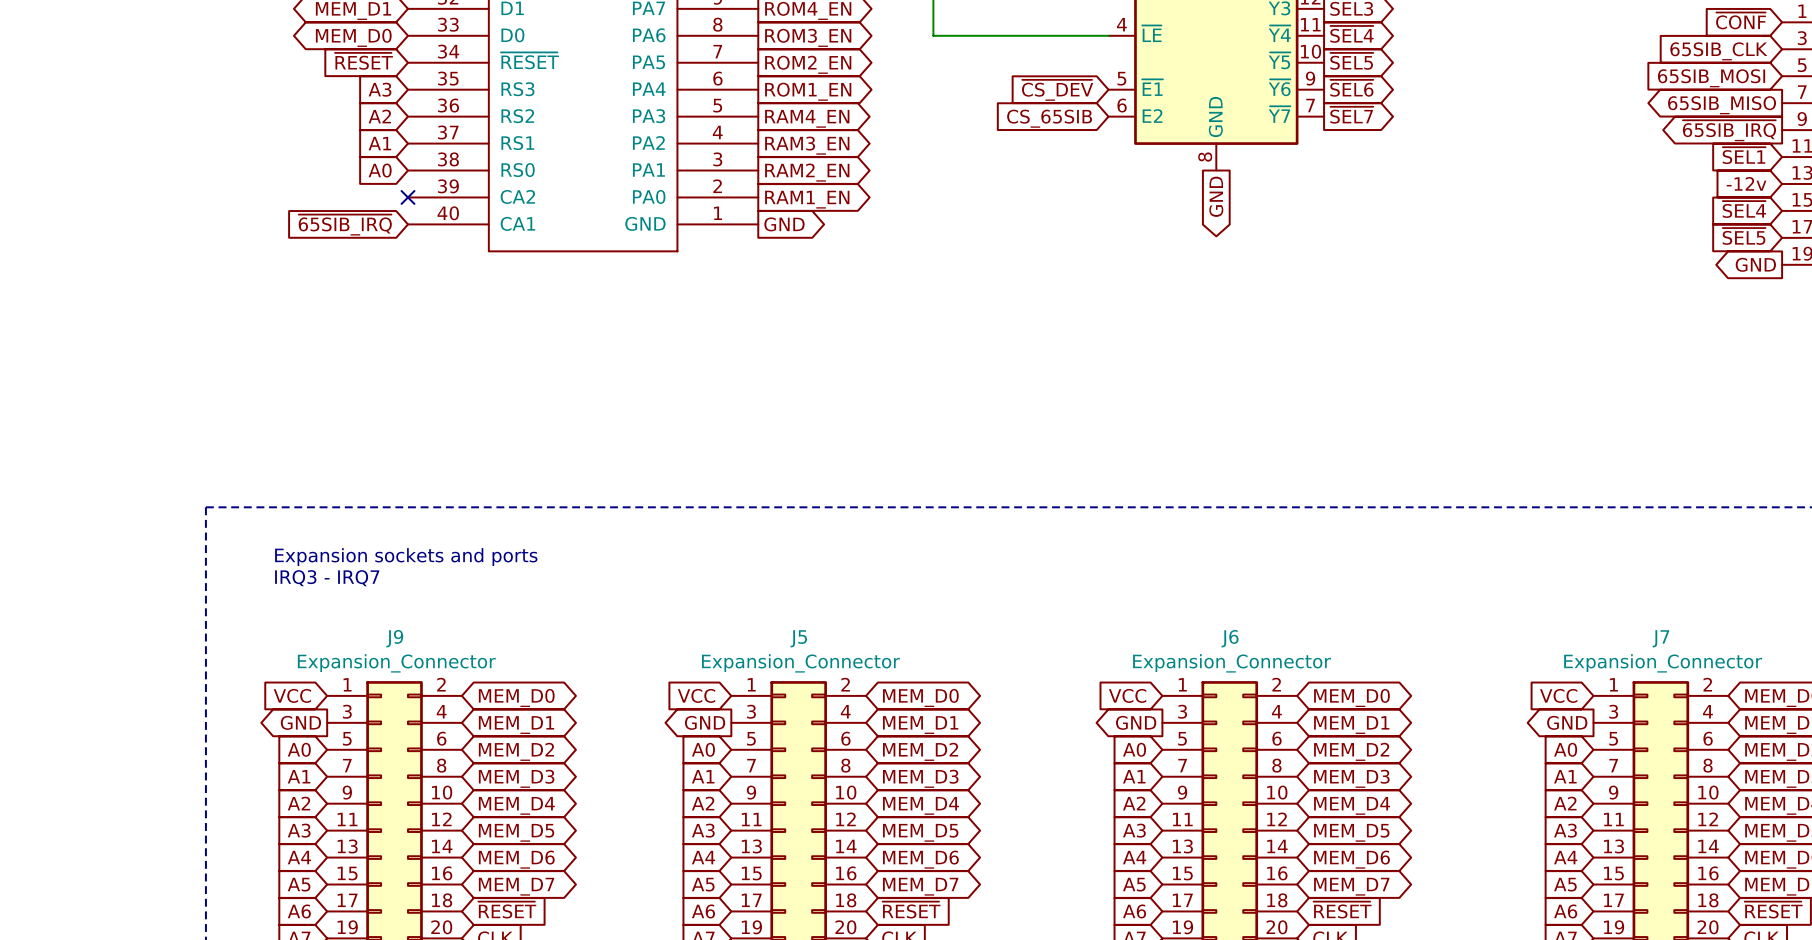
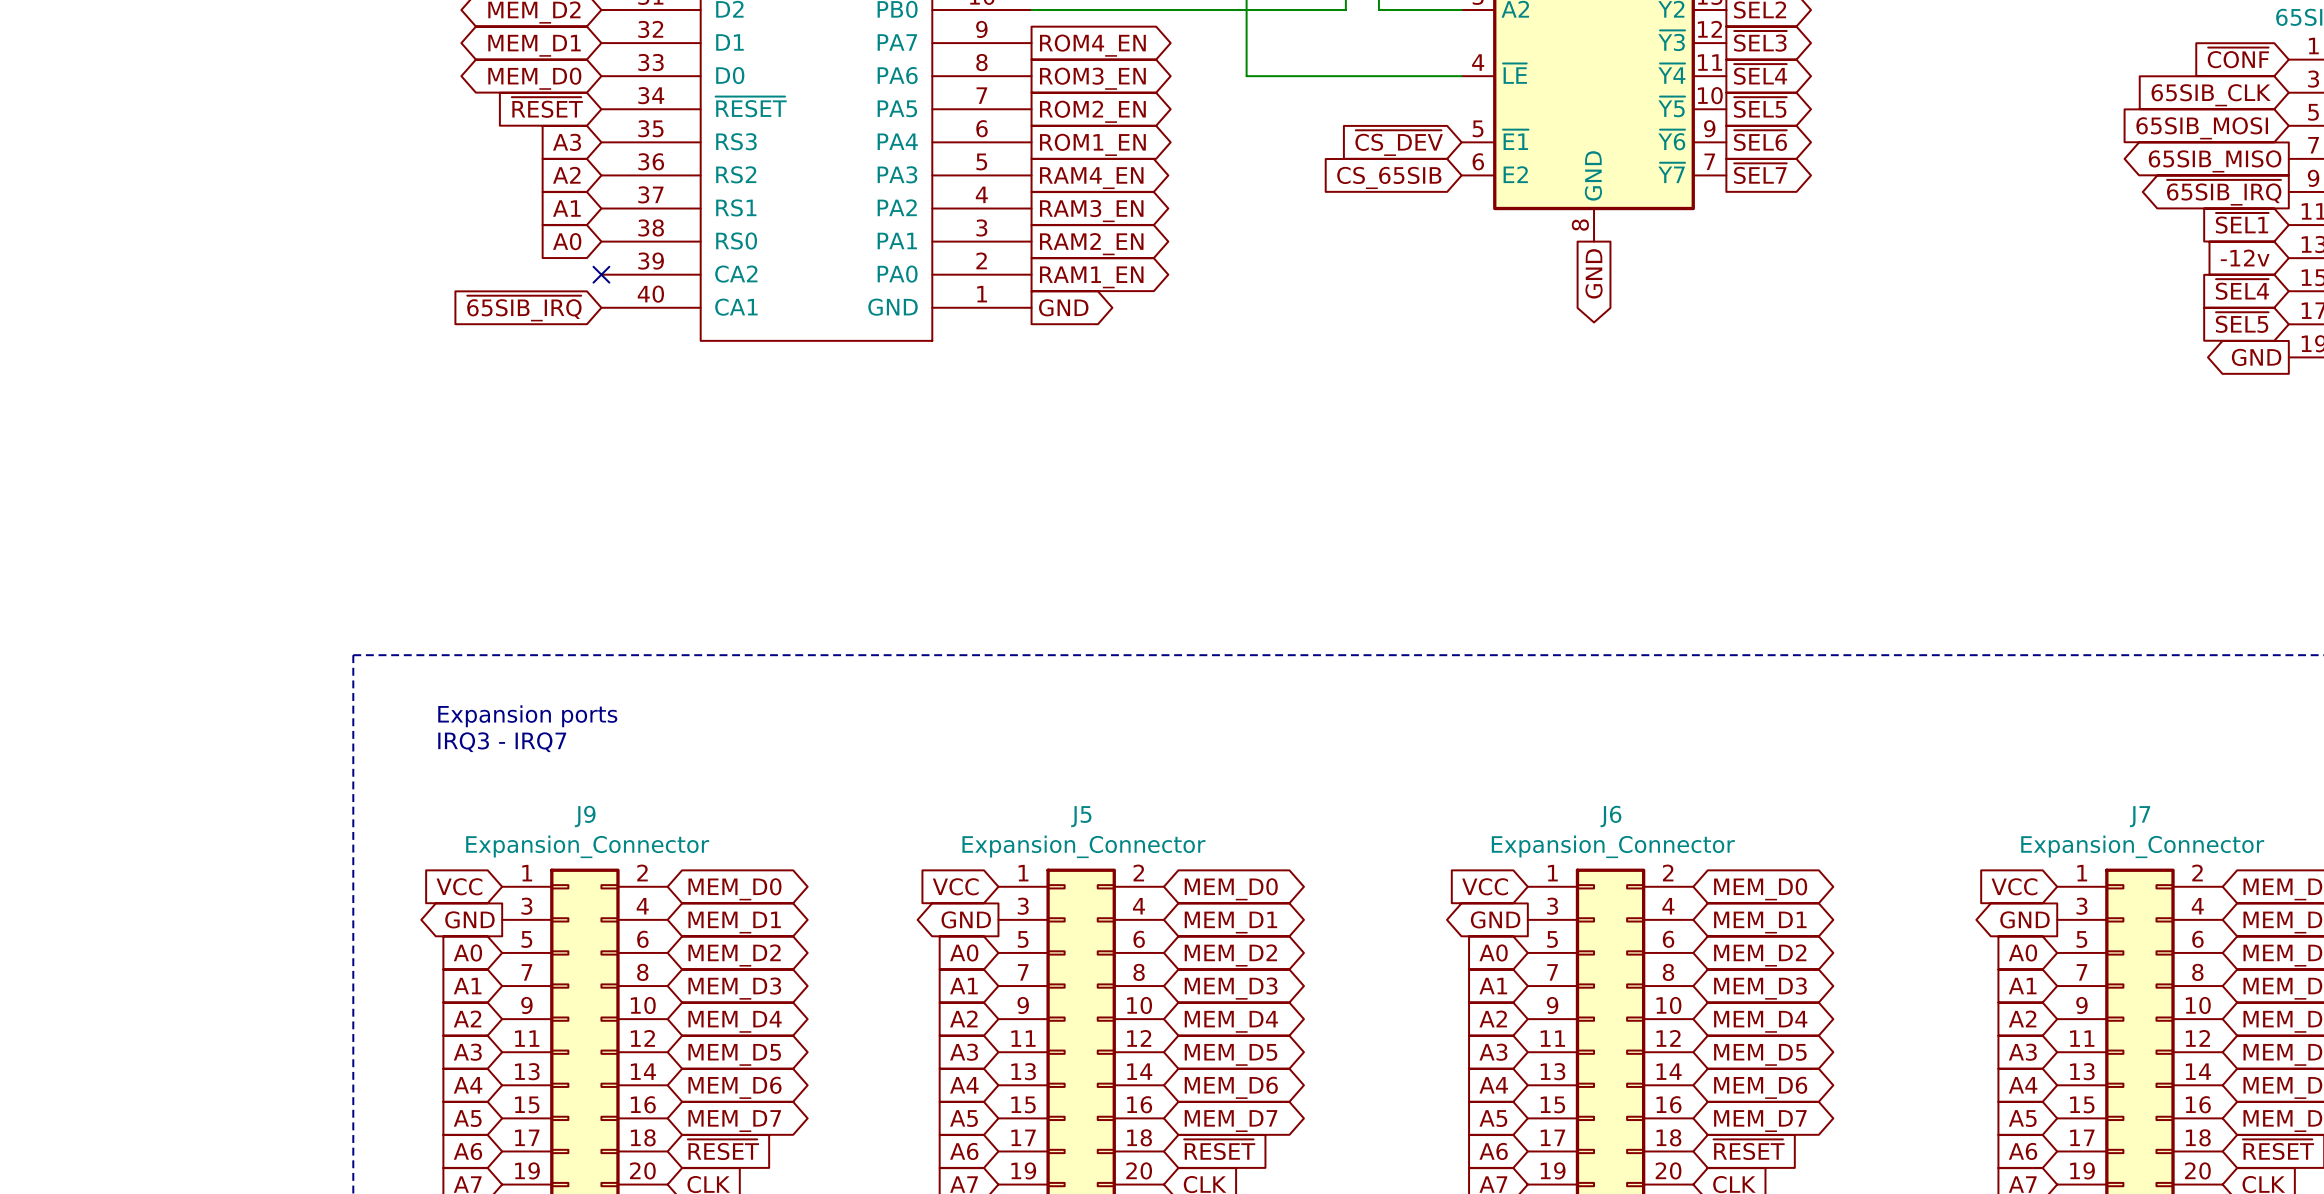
text: Expansion sockets and ports (406, 557) -> Expansion ports (527, 716)

